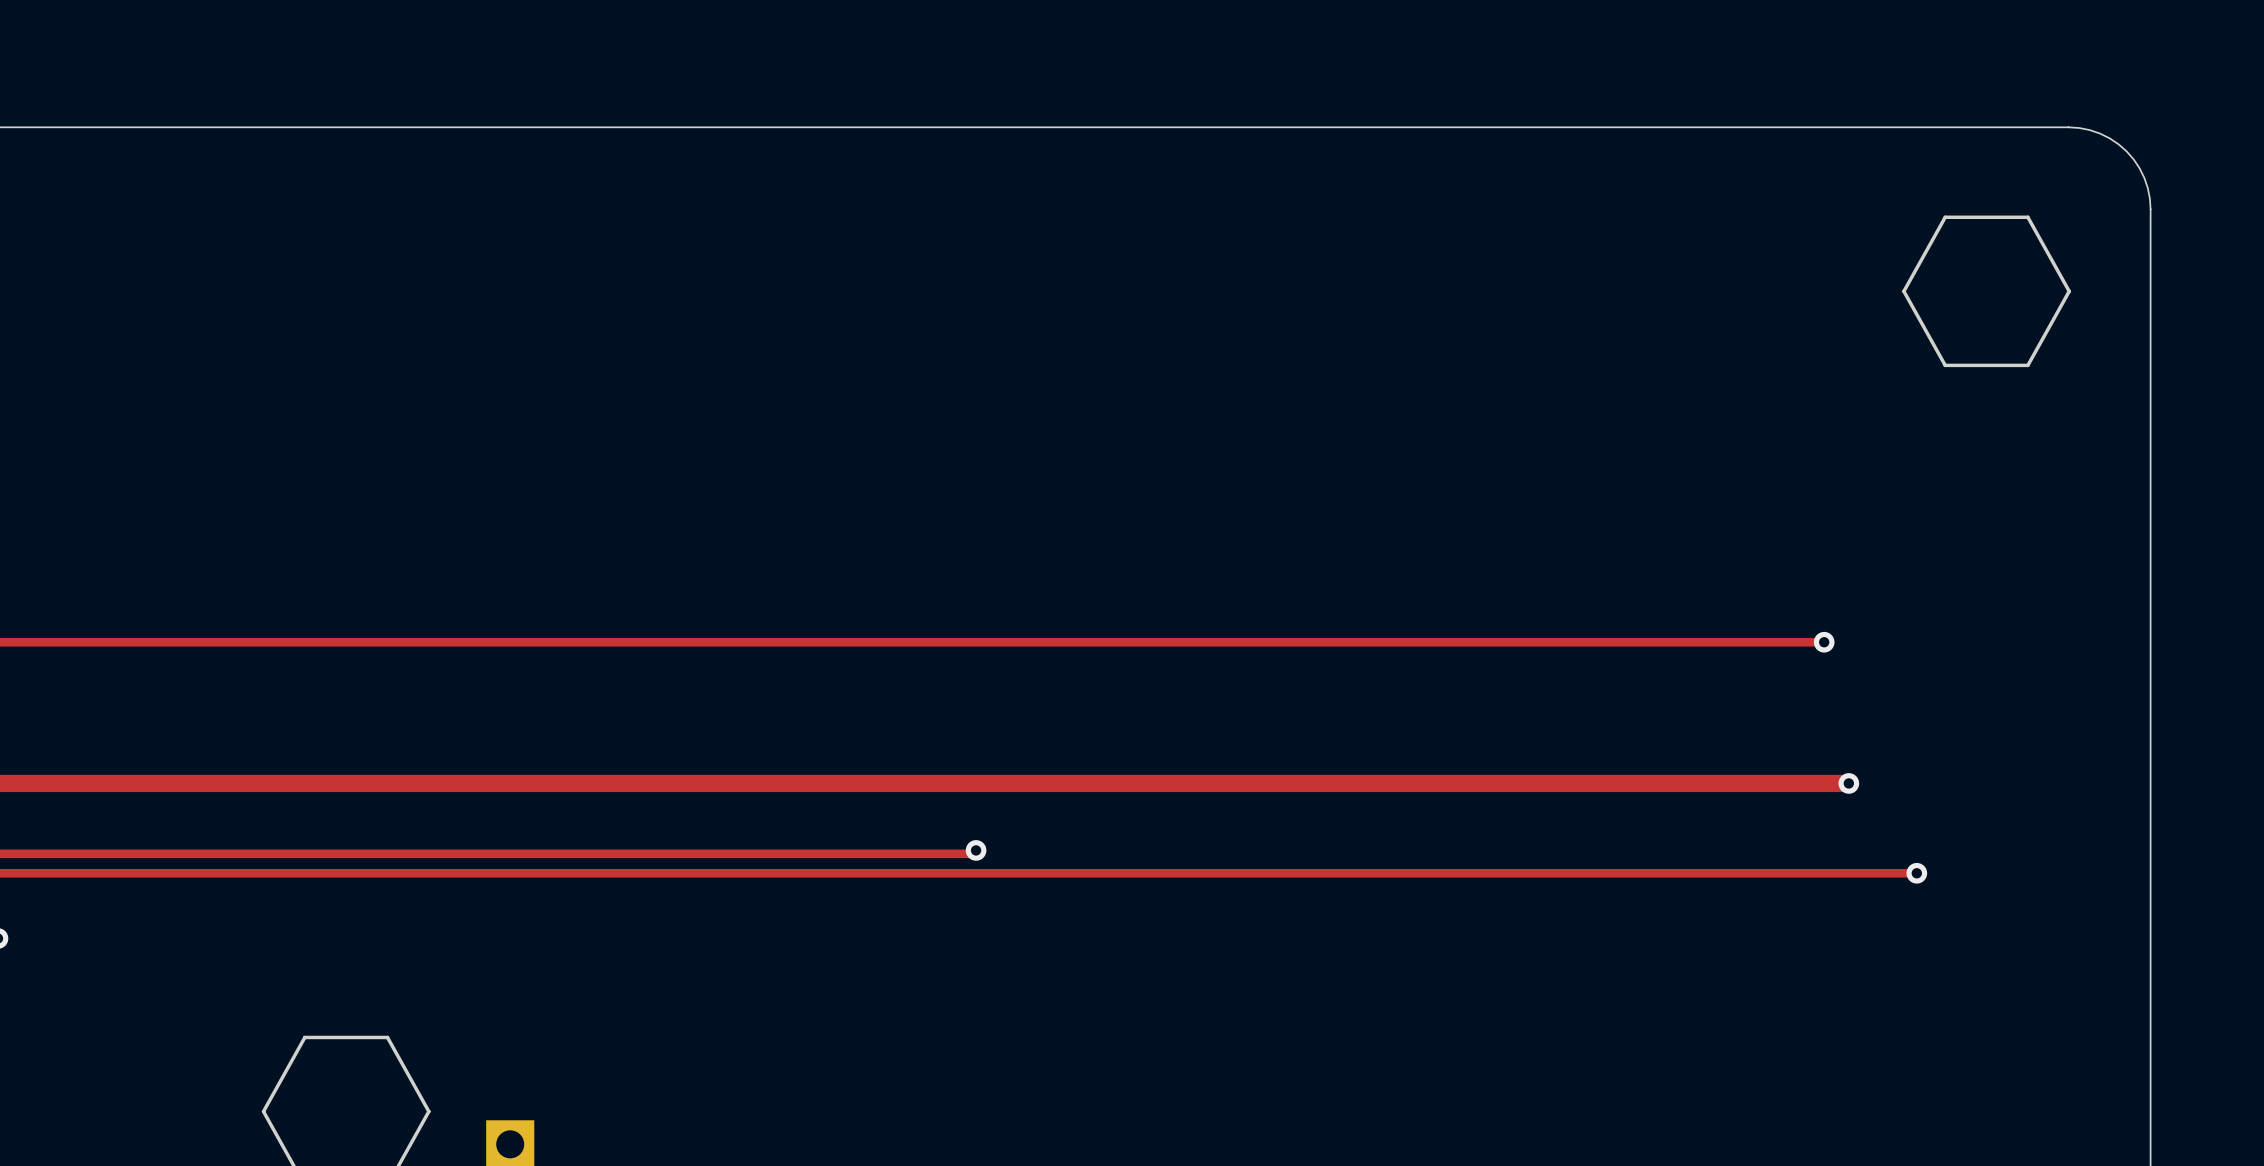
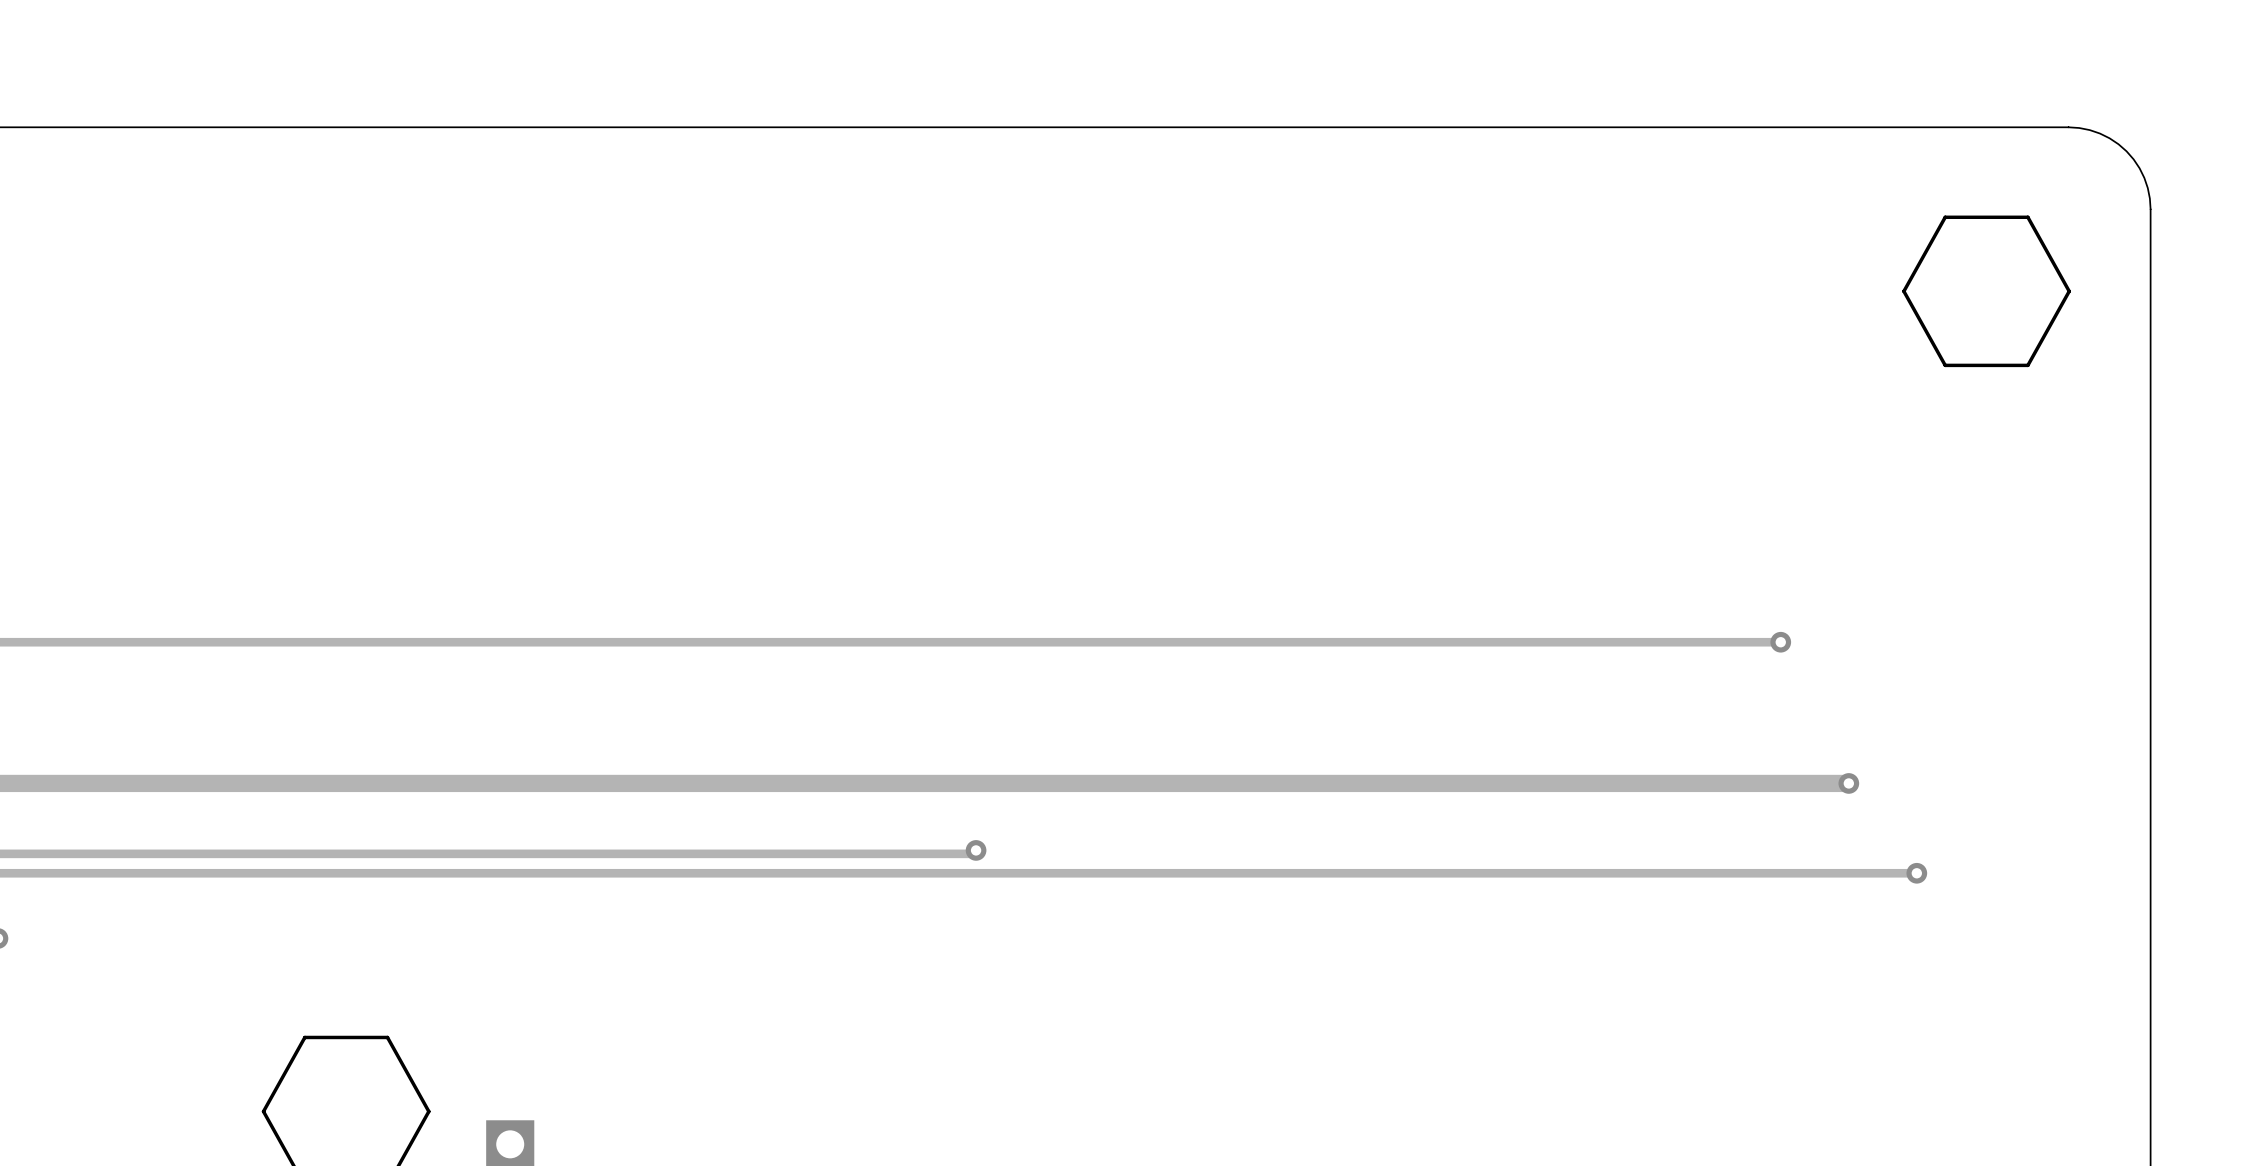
track: (1780, 642) (1824, 642) -> none
via position: (1824, 642) -> (1780, 642)

